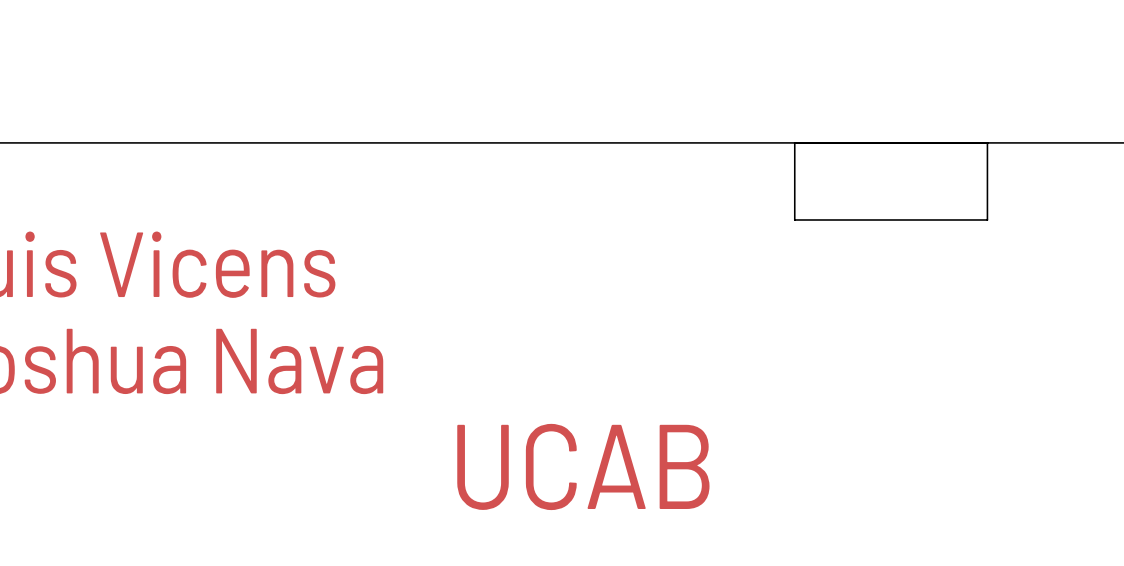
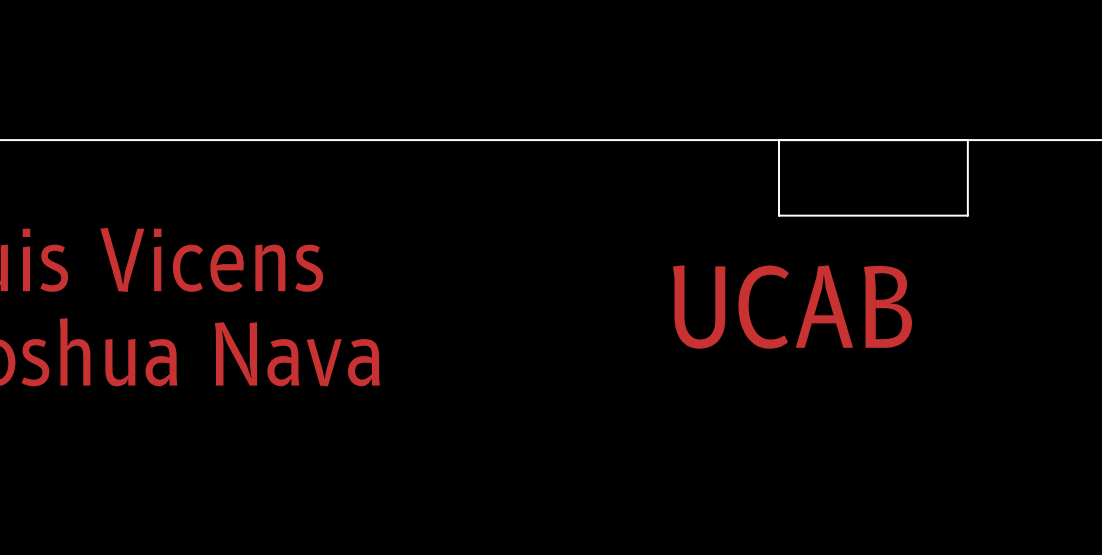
text position: UCAB (583, 466) -> UCAB (792, 307)

